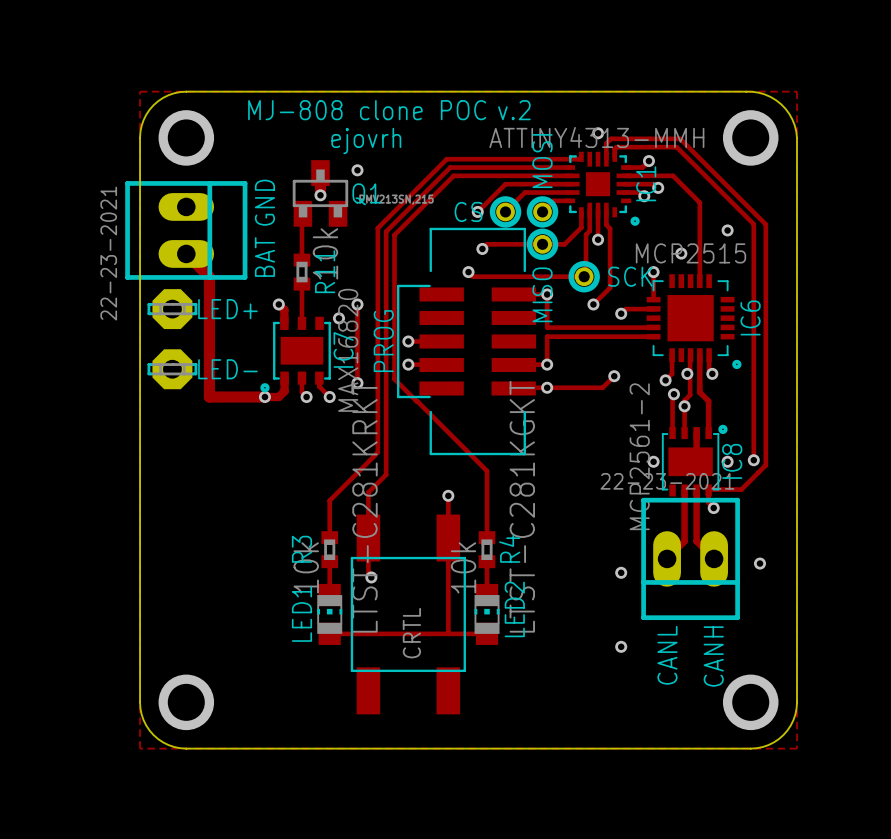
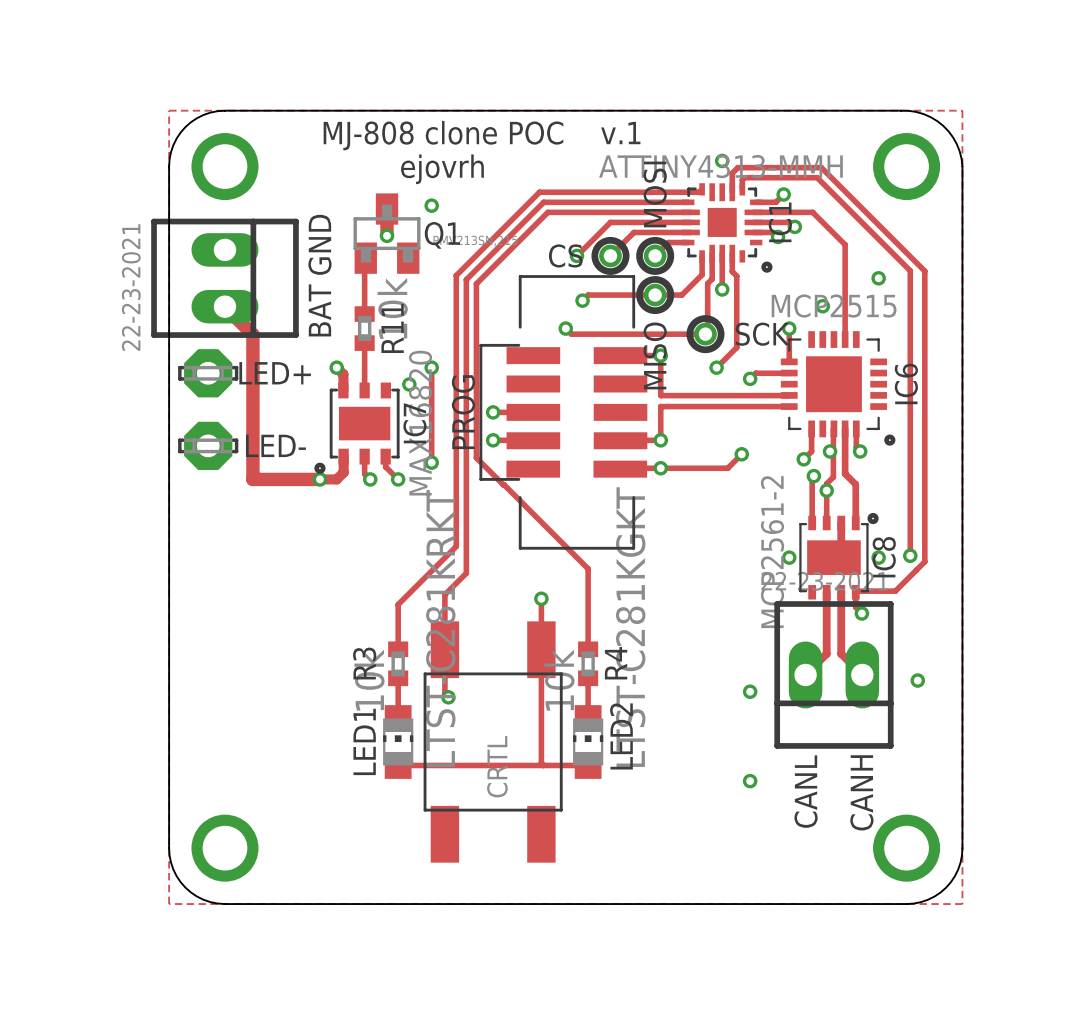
text: v.2 (514, 110) -> v.1 (620, 133)

